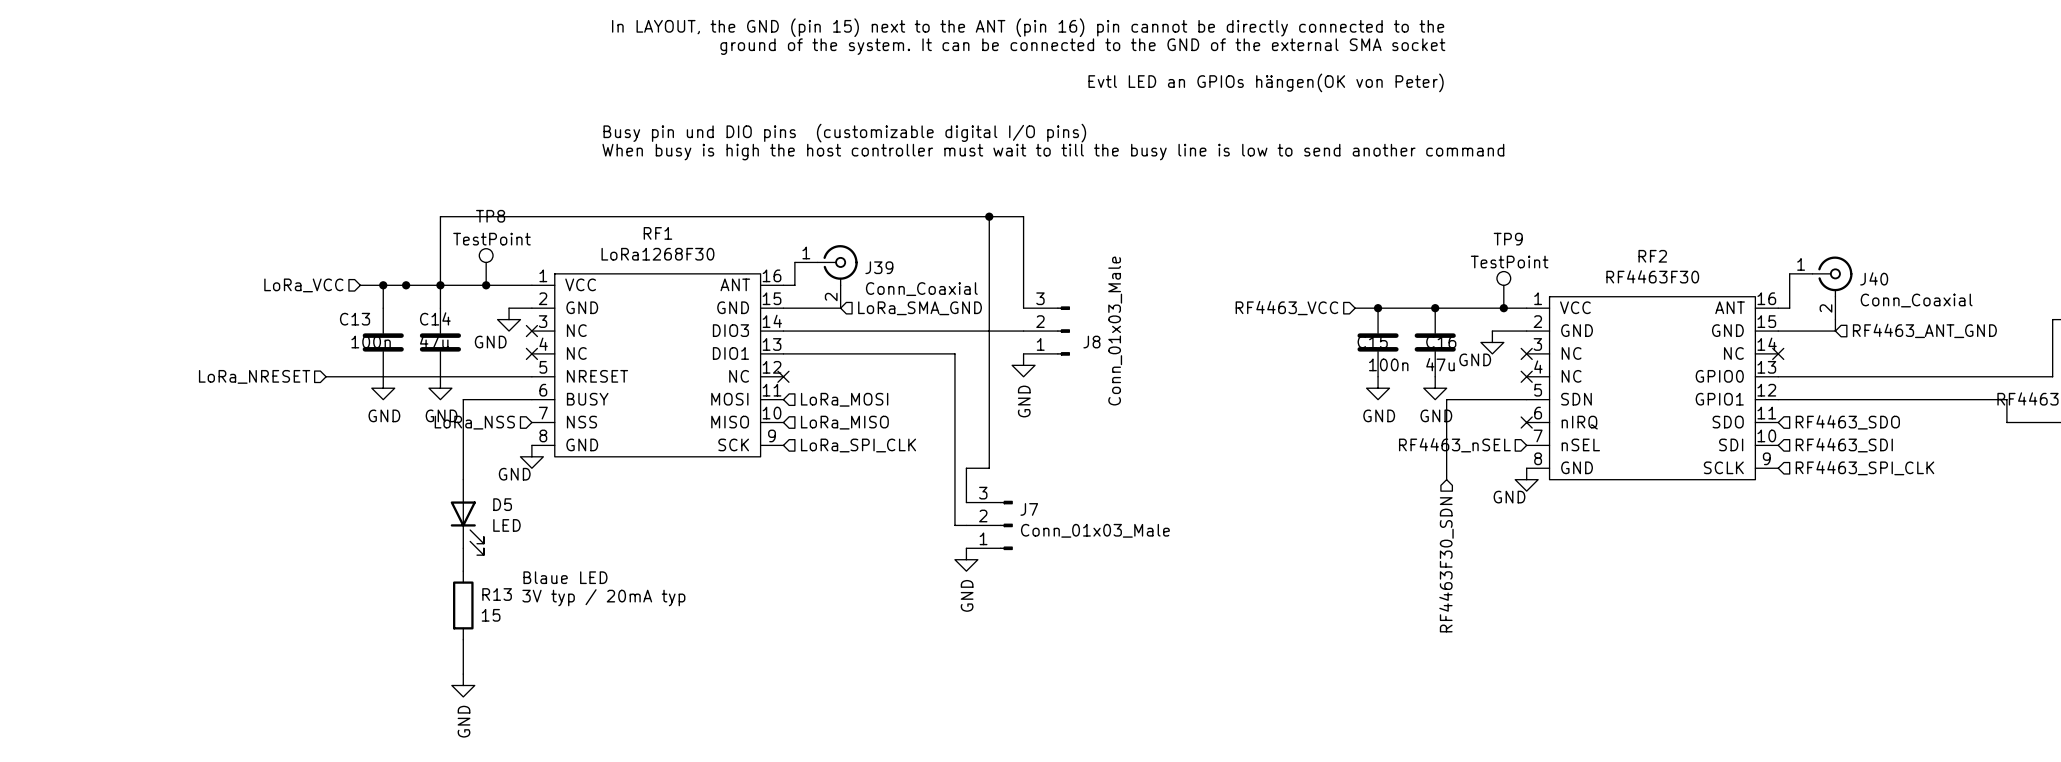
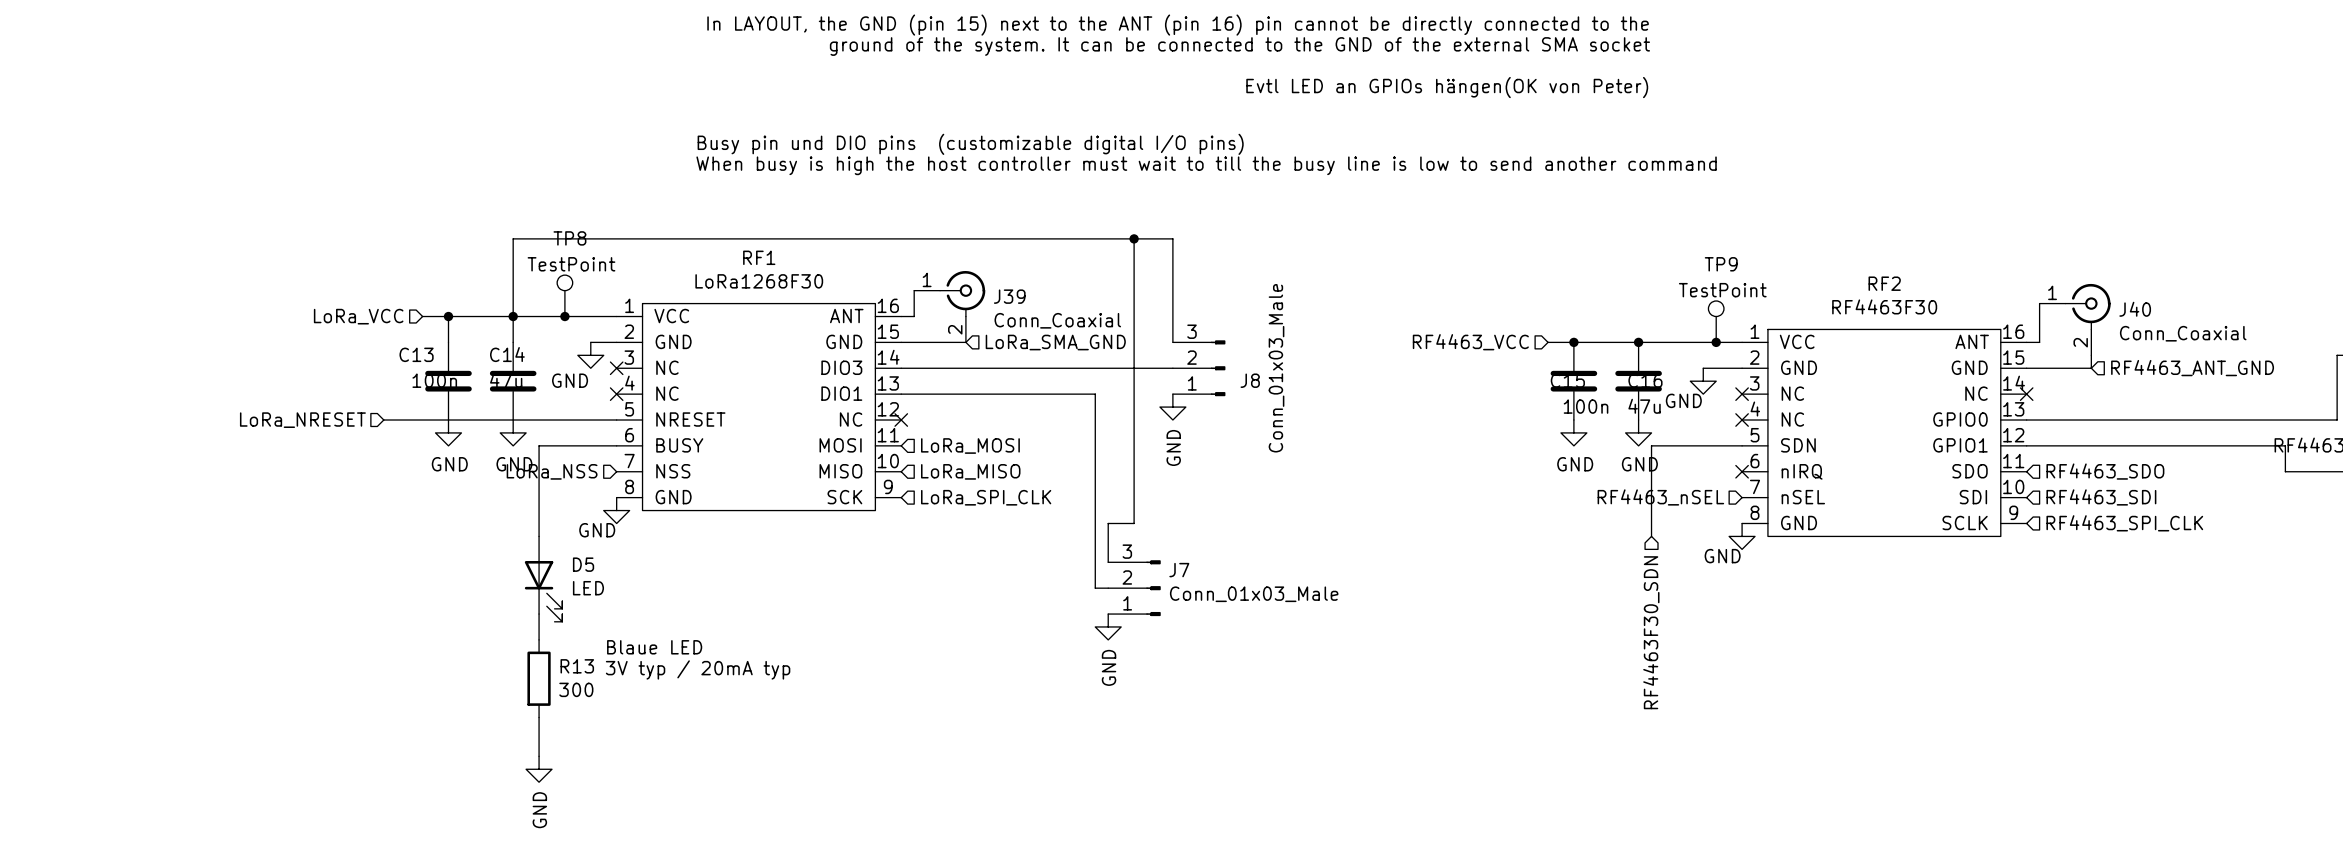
junction: (406, 285) -> none
R13 value: 15 (491, 615) -> 300 (576, 689)

